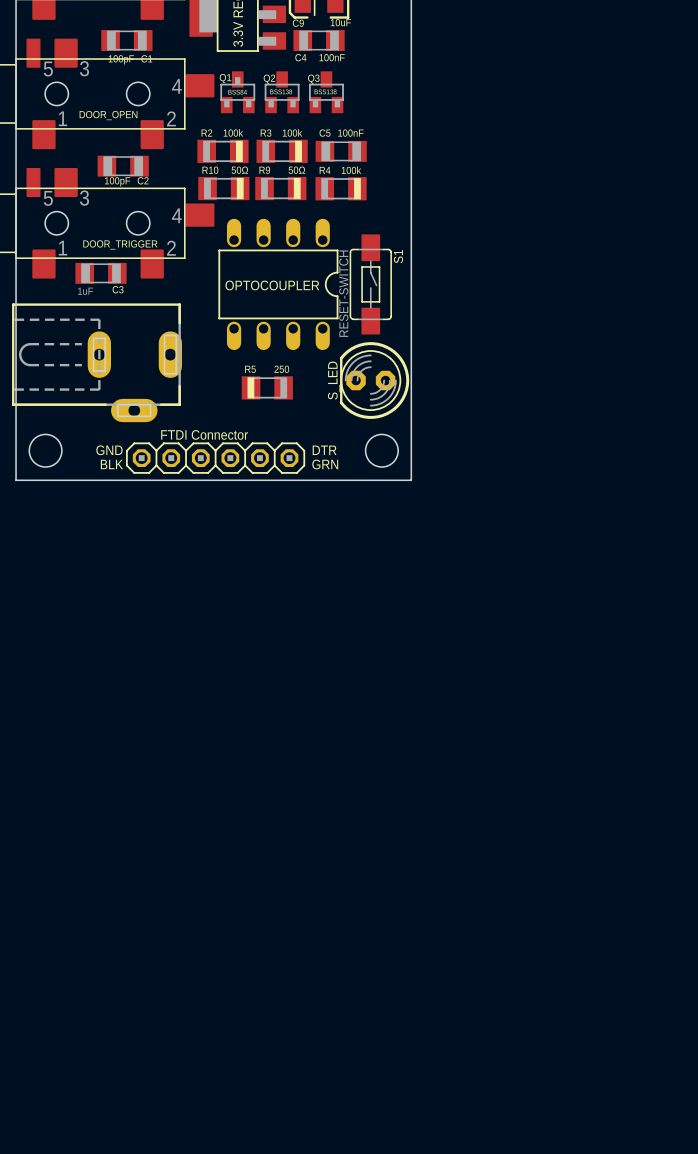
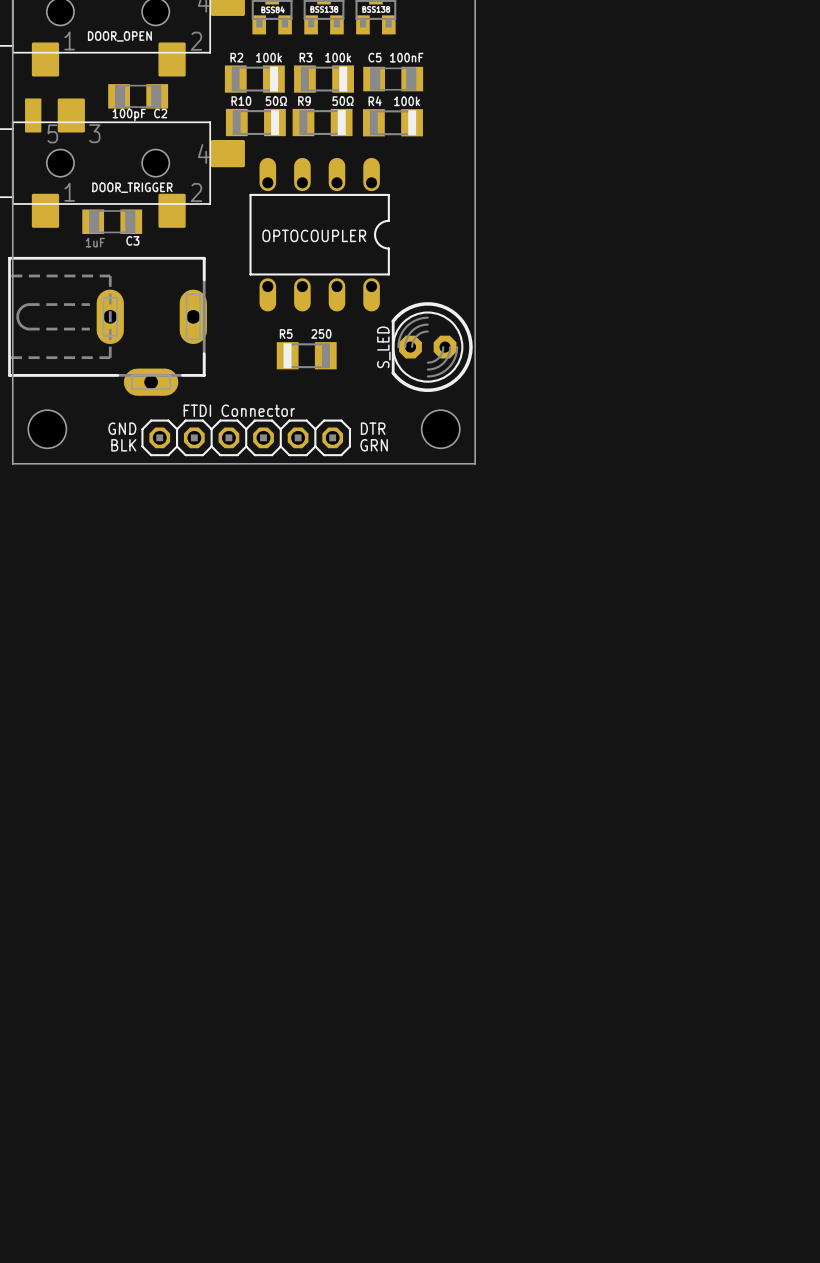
S1: RESET-SWITCH (370, 284) -> none

